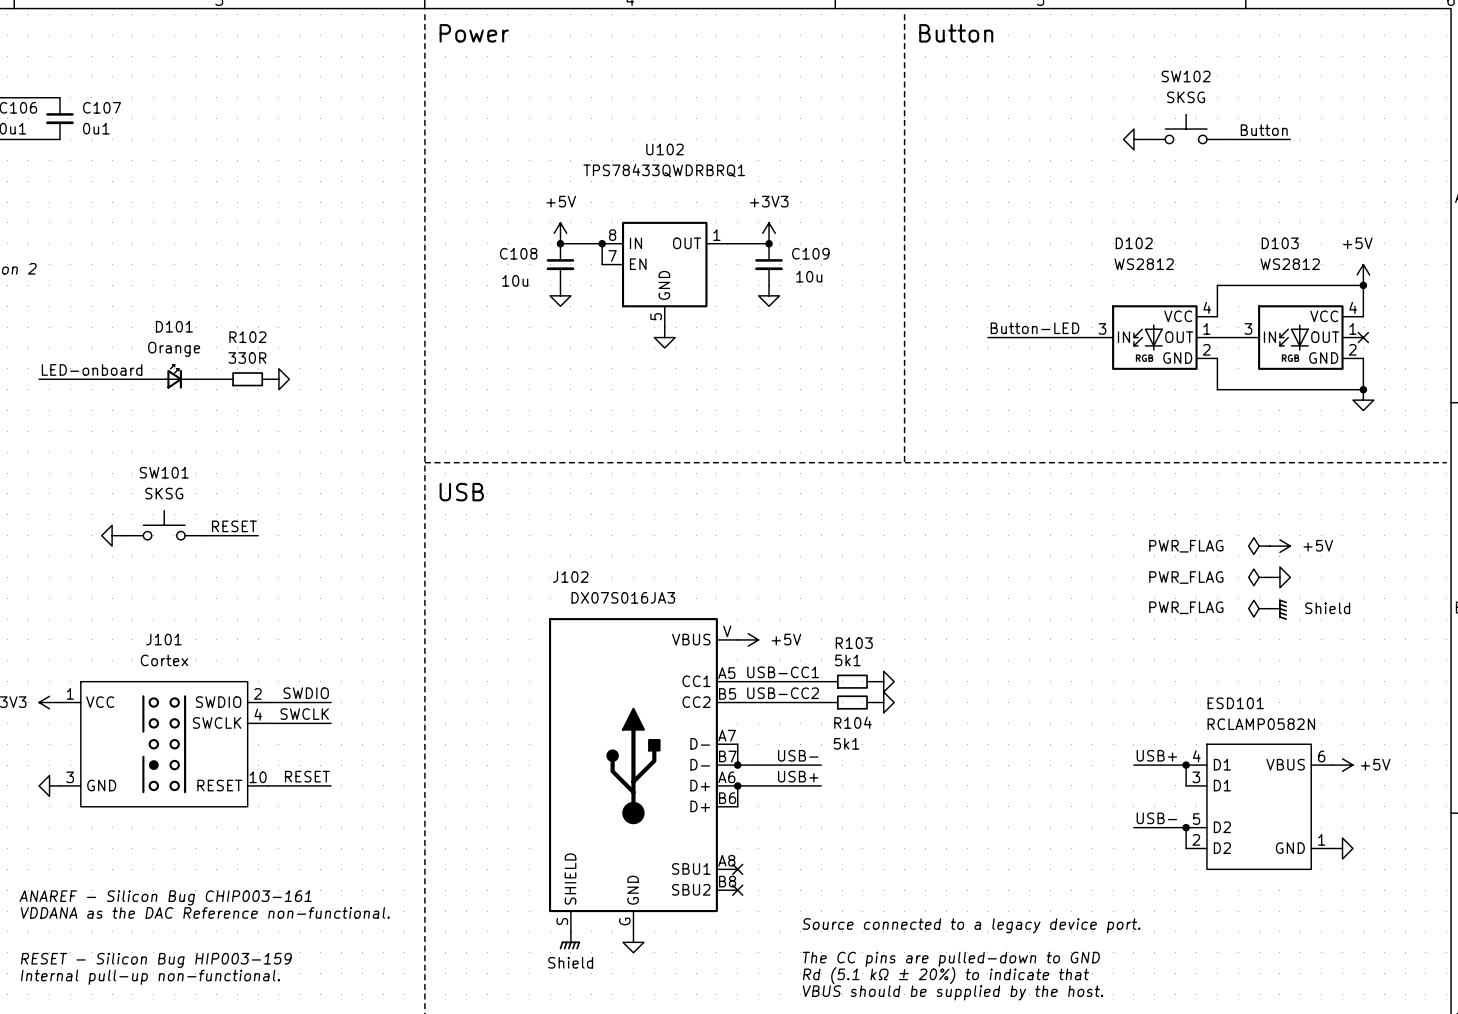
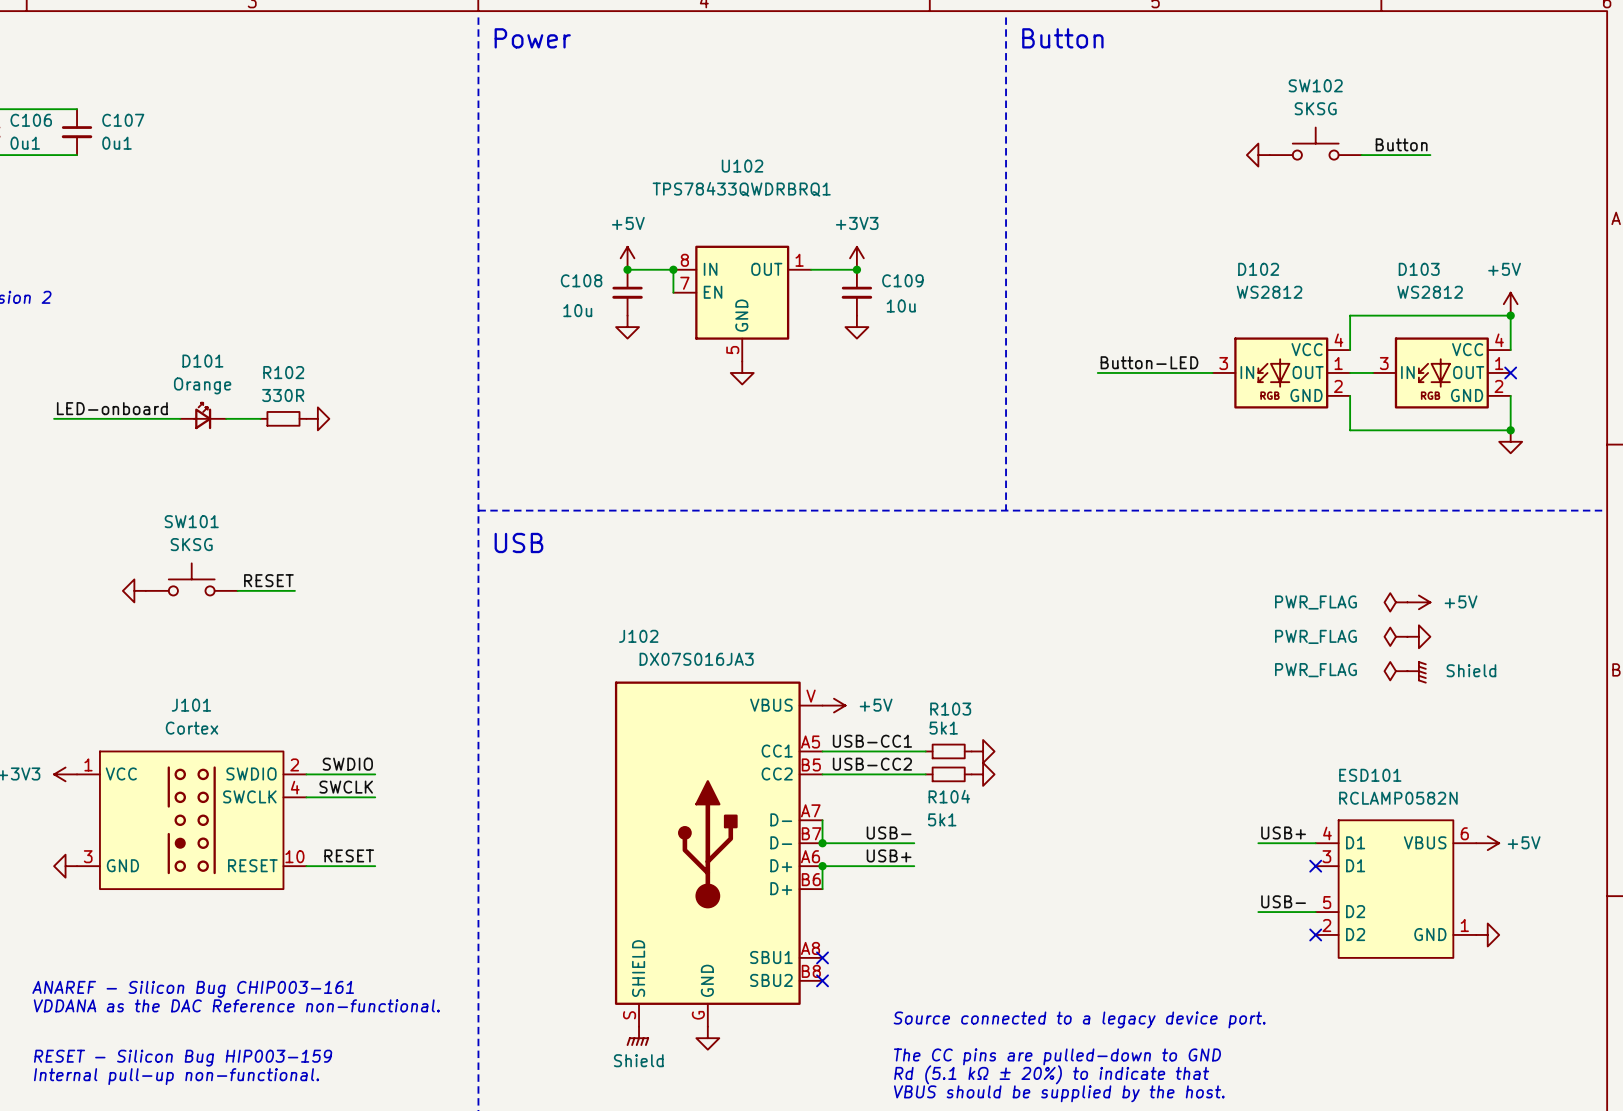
wire: (1186, 765) (1186, 785) -> none
junction: (1186, 765) -> none
no-connect mark: none -> (1315, 866)
wire: (1186, 827) (1186, 848) -> none
junction: (1186, 827) -> none
no-connect mark: none -> (1315, 934)

